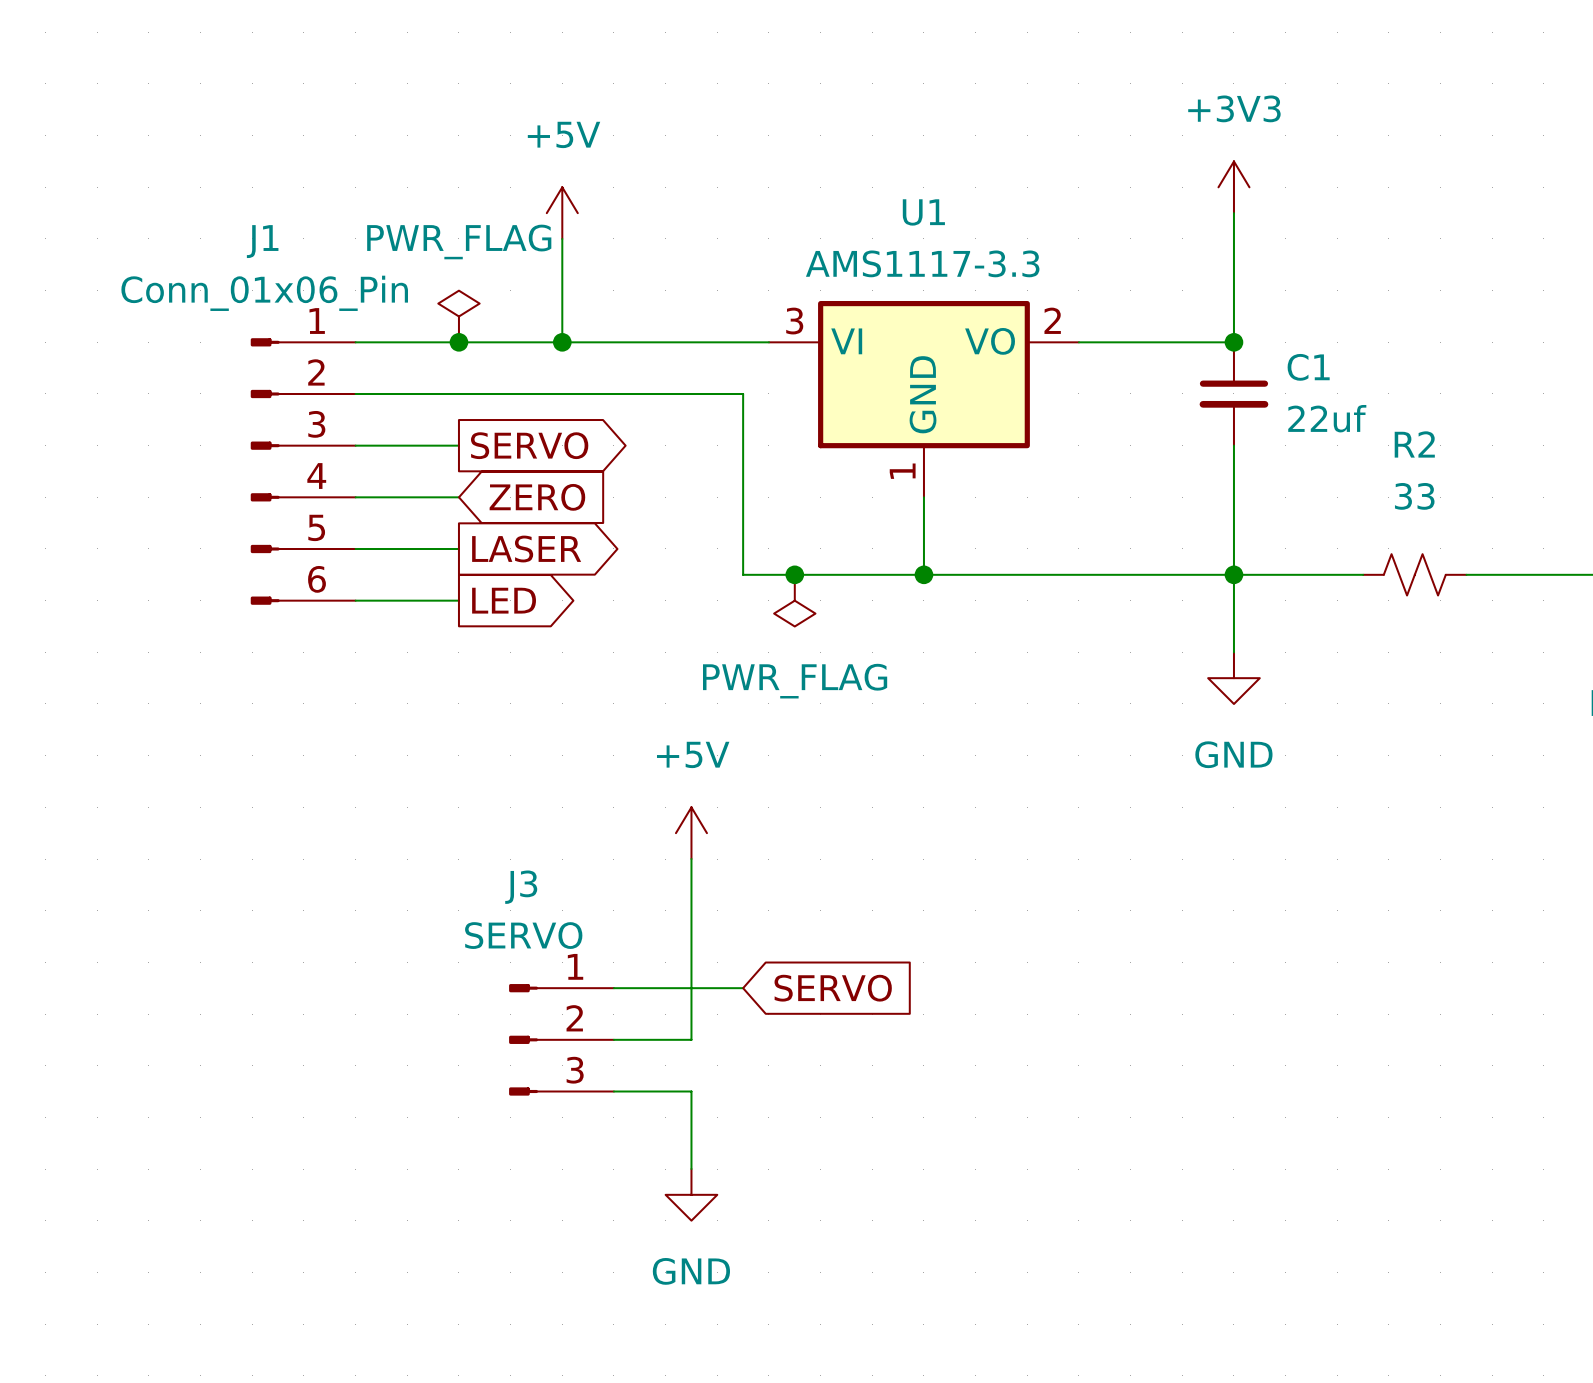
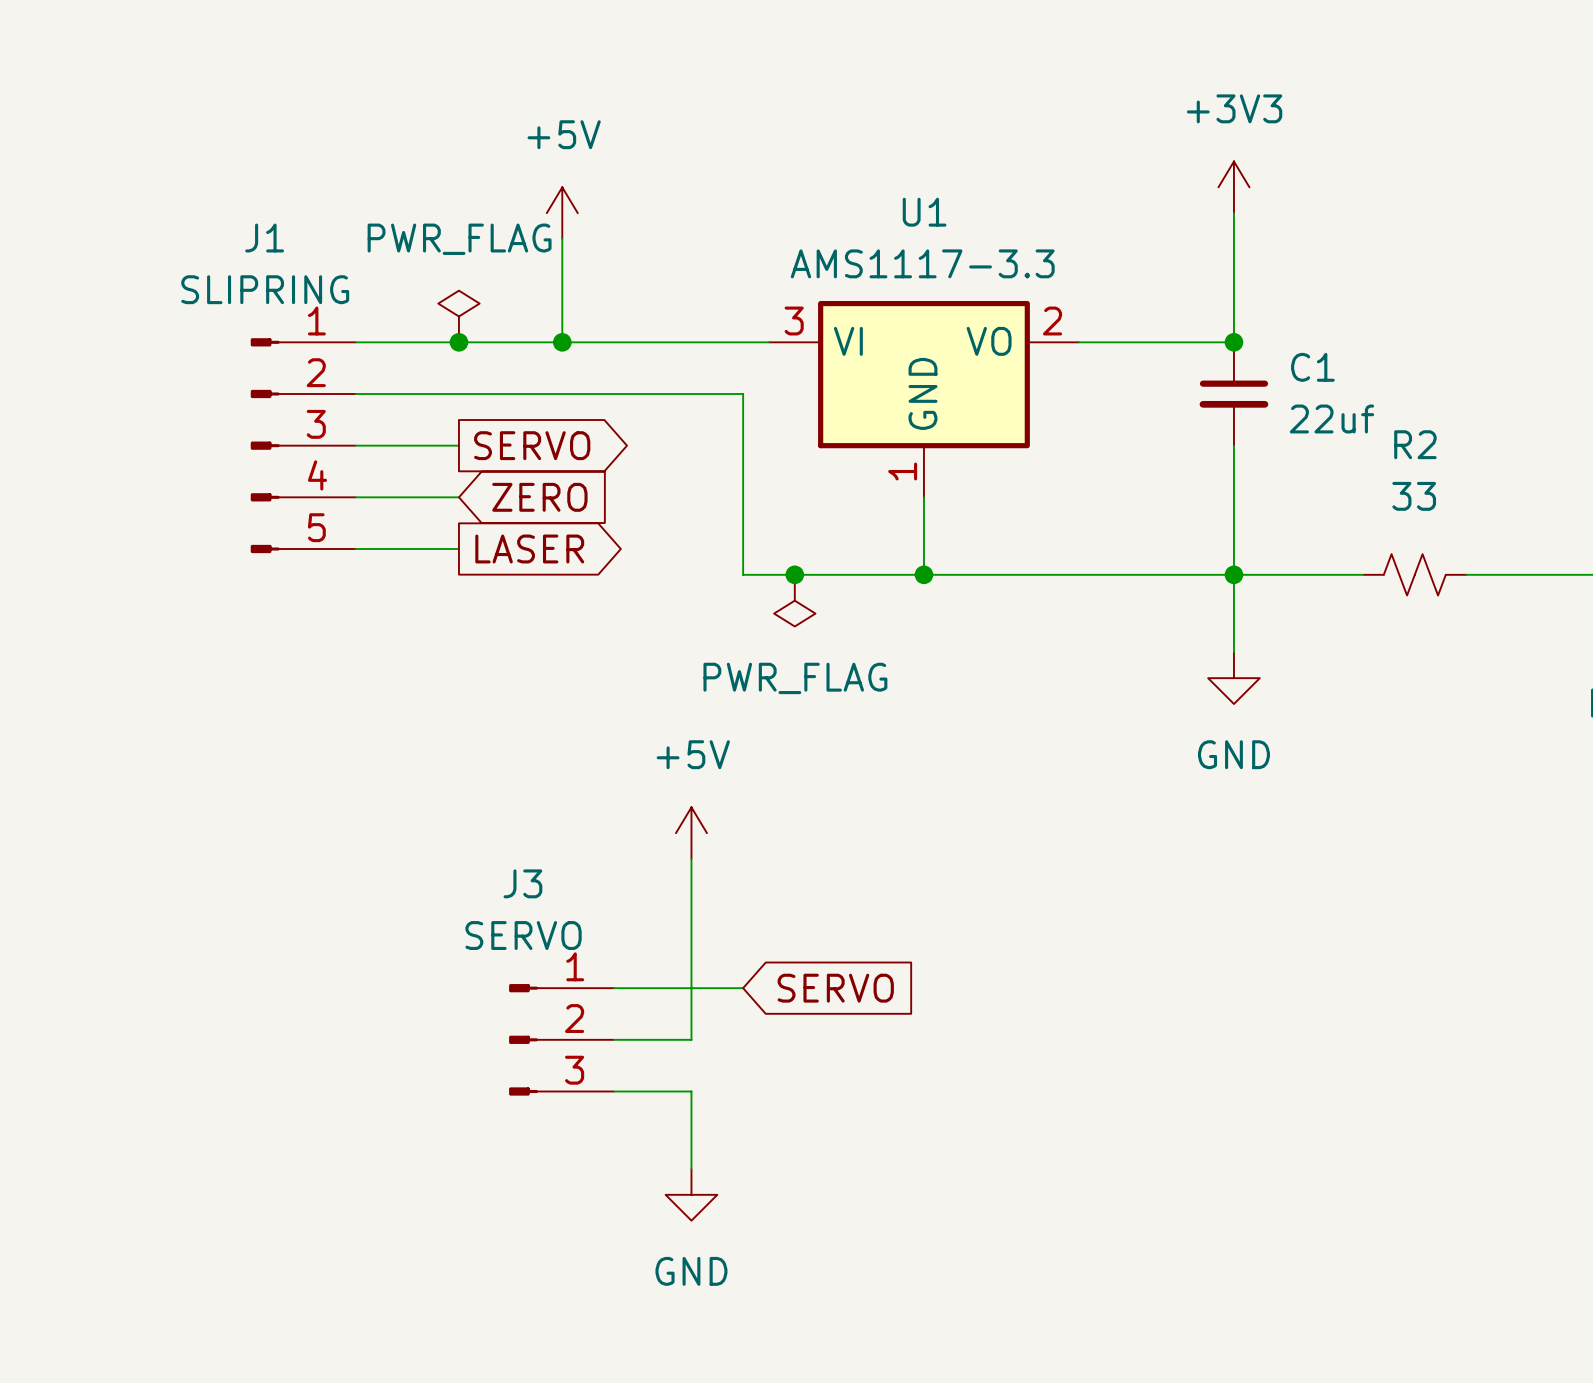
J1 value: Conn_01x06_Pin (264, 293) -> SLIPRING (265, 289)
J1 symbol: [250, 338, 356, 605] -> [250, 338, 356, 554]
wire: (355, 600) (458, 600) -> none
global label: LED (504, 600) -> none

